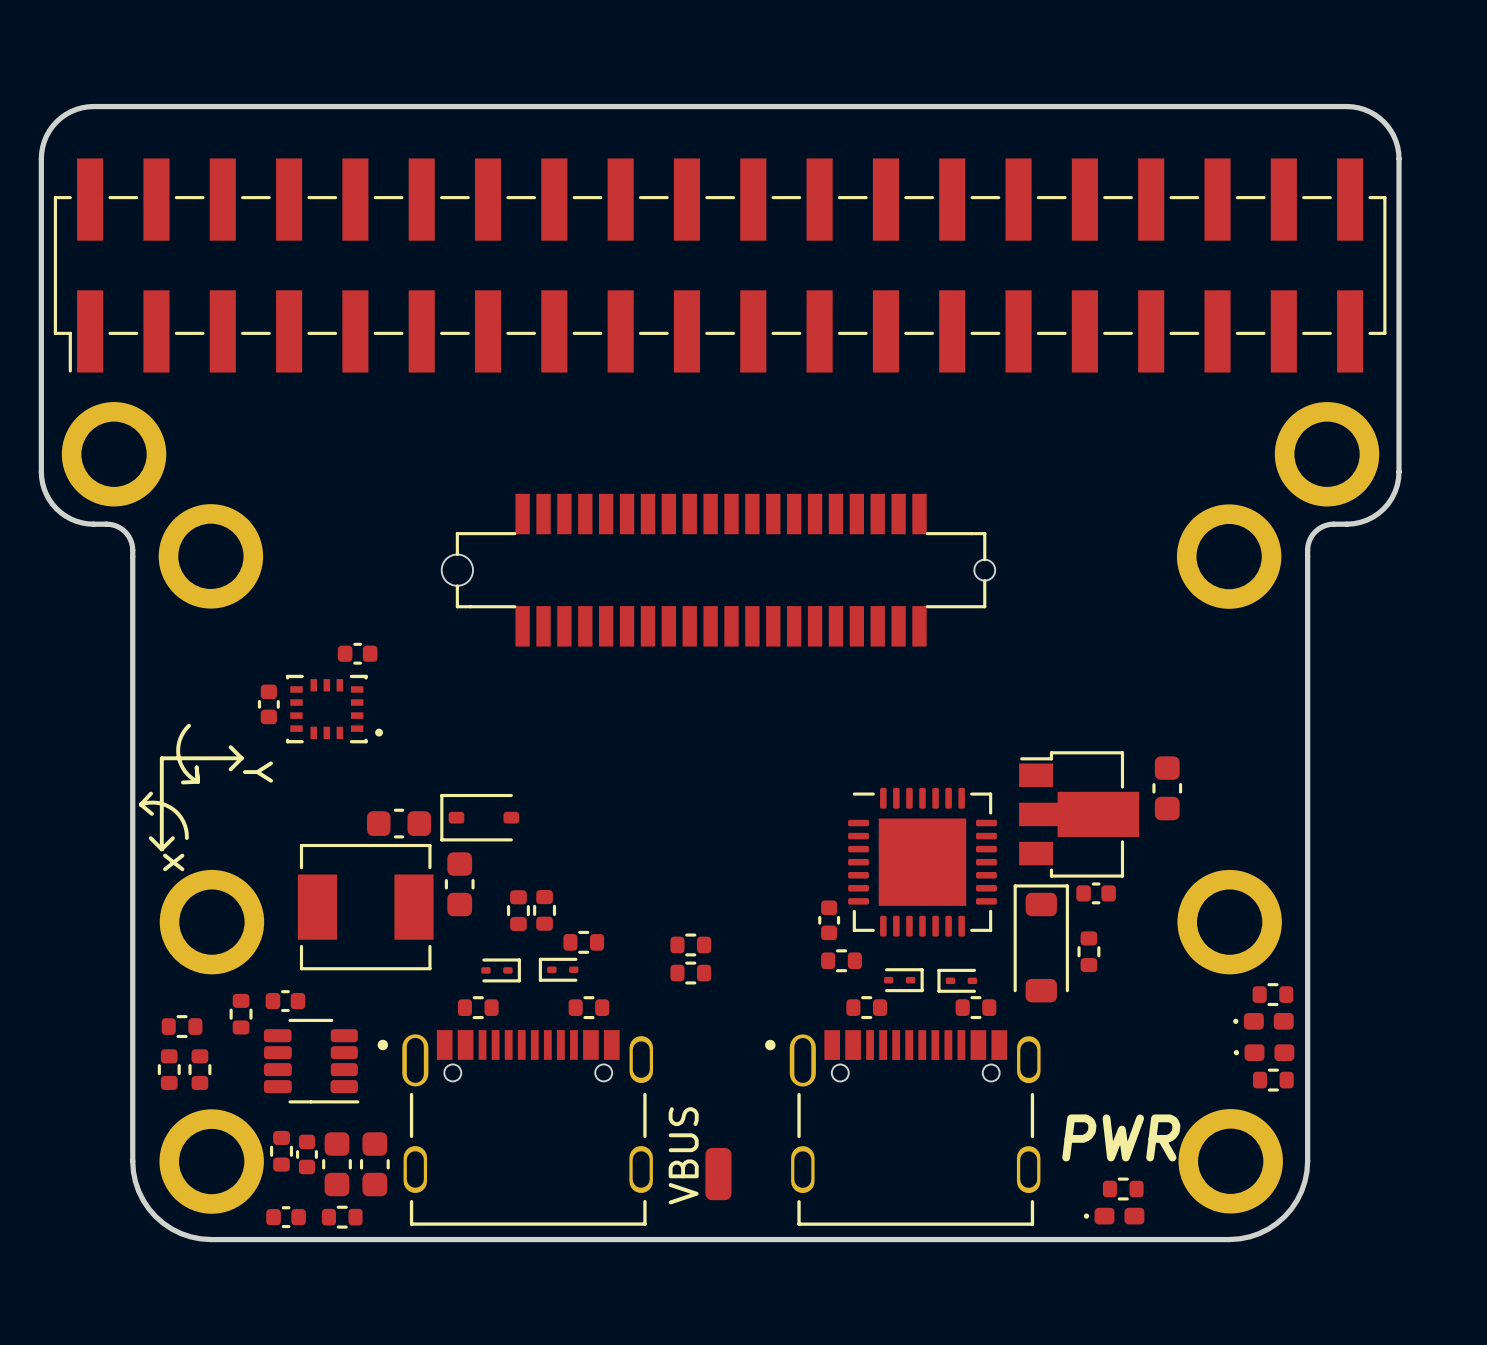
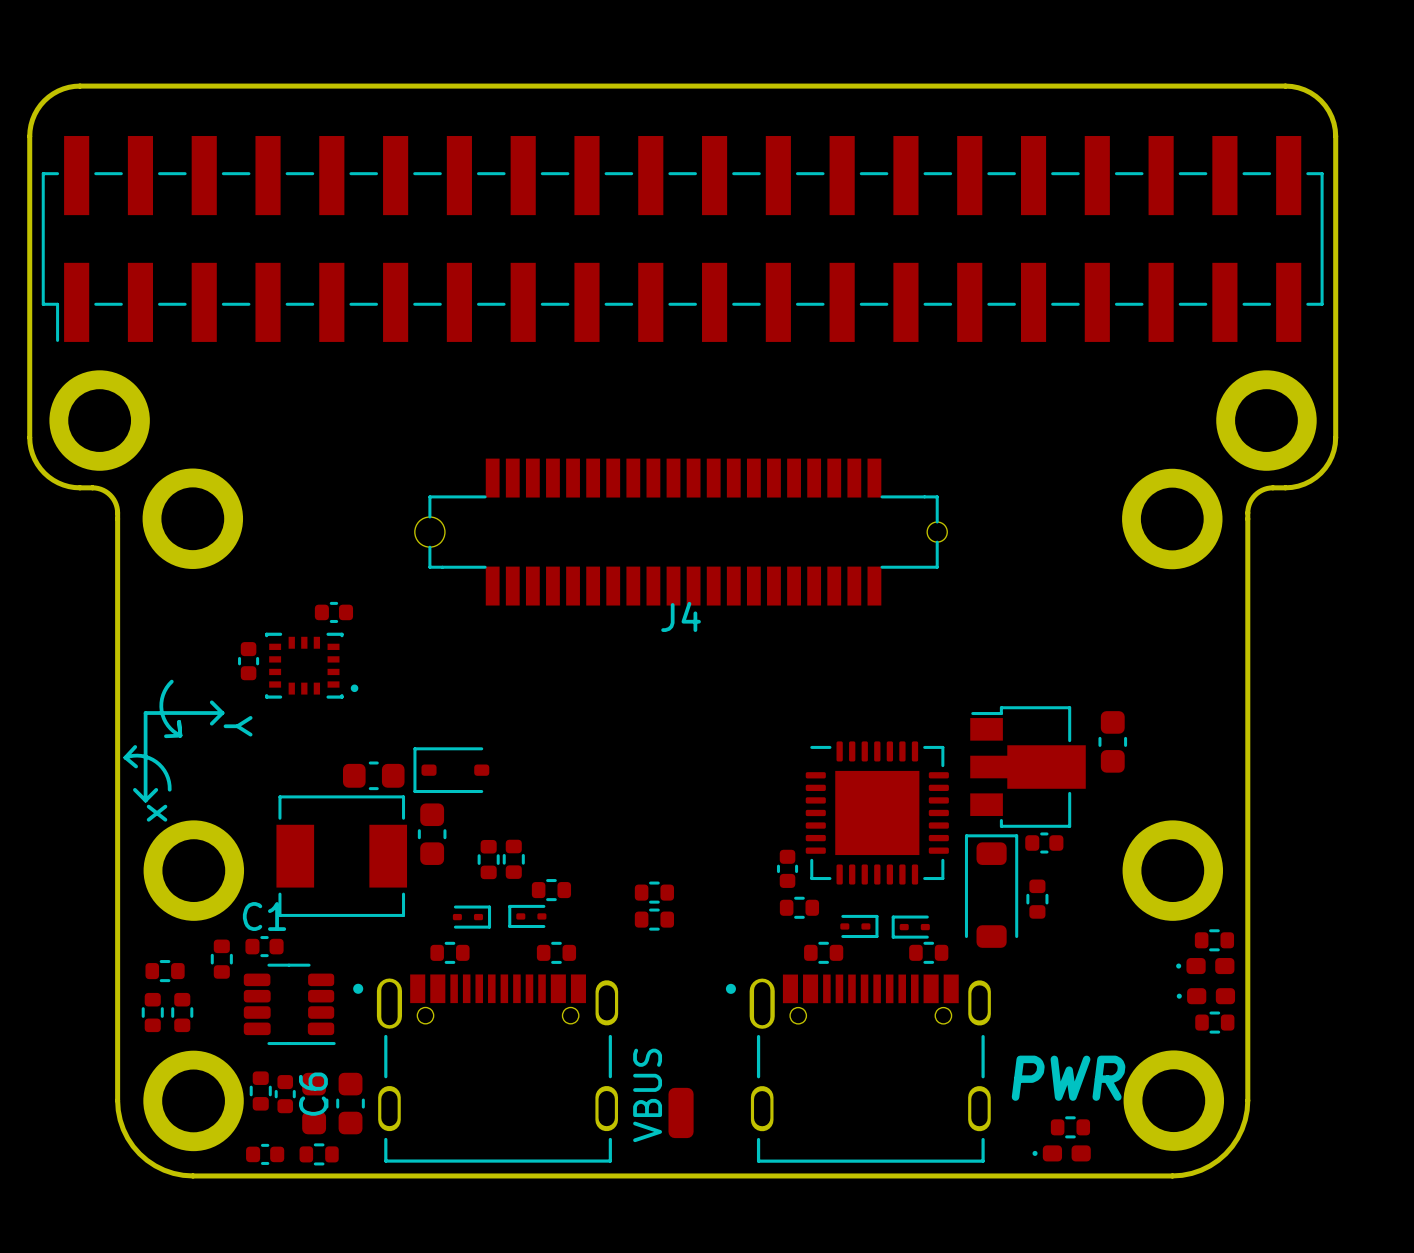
J4: none -> (682, 631)
C1 name: none -> C1 (264, 916)
C6 name: none -> C6 (313, 1094)

